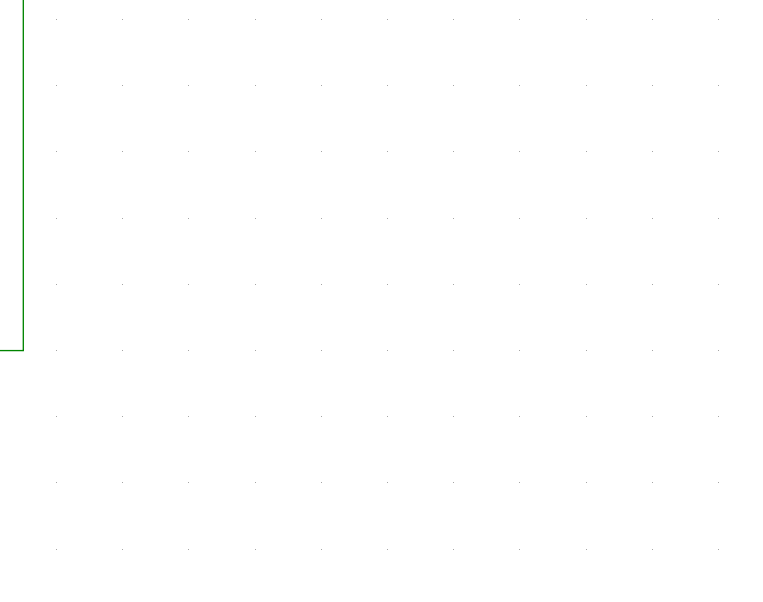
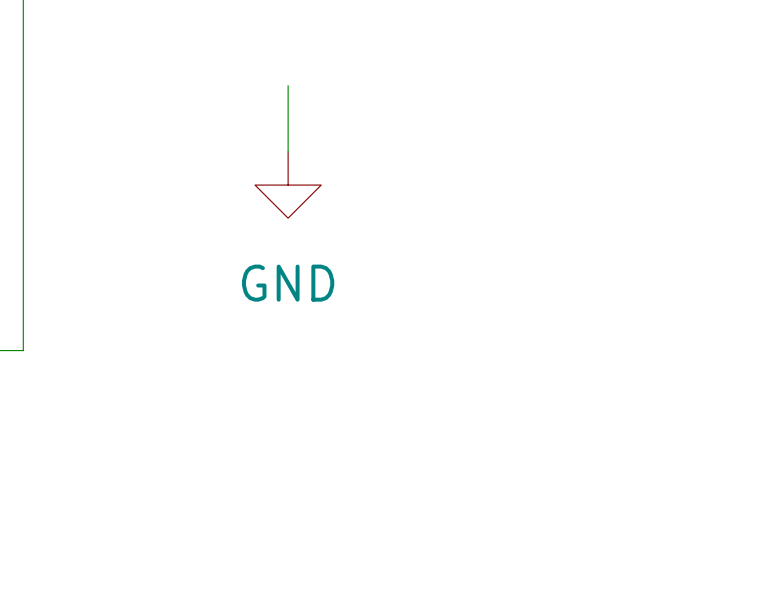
wire: none -> (288, 85) (288, 151)
power symbol: none -> GND (288, 185)

